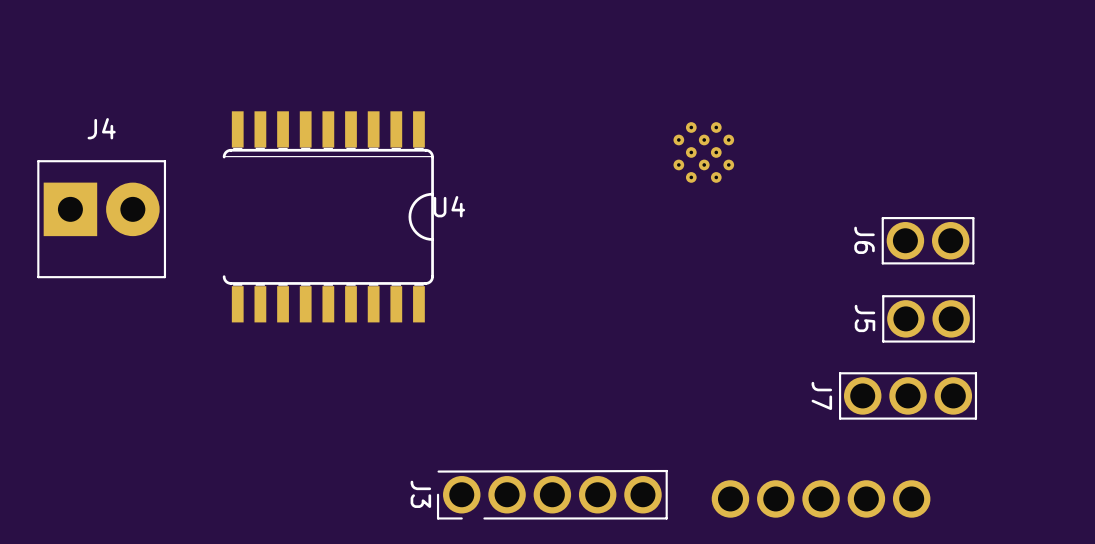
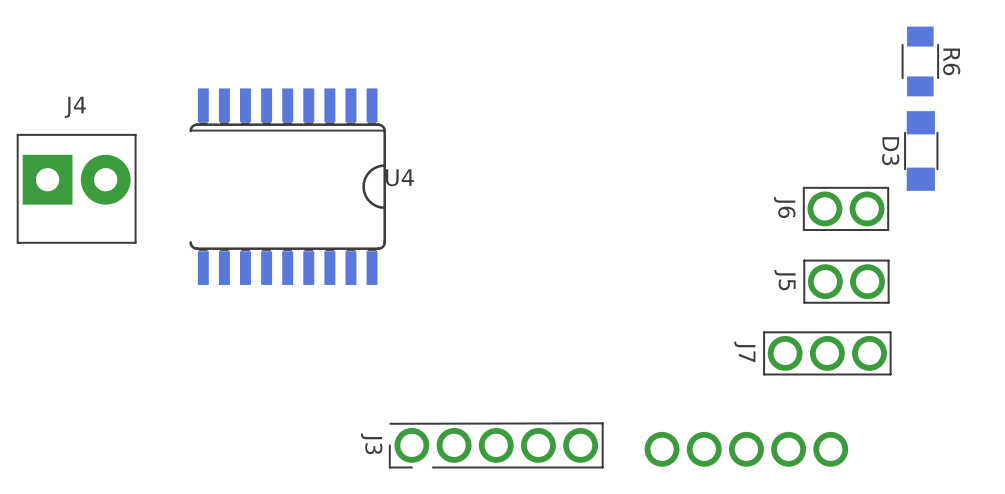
R6: none -> (920, 61)
part: (703, 152) -> none
D3: none -> (921, 150)

